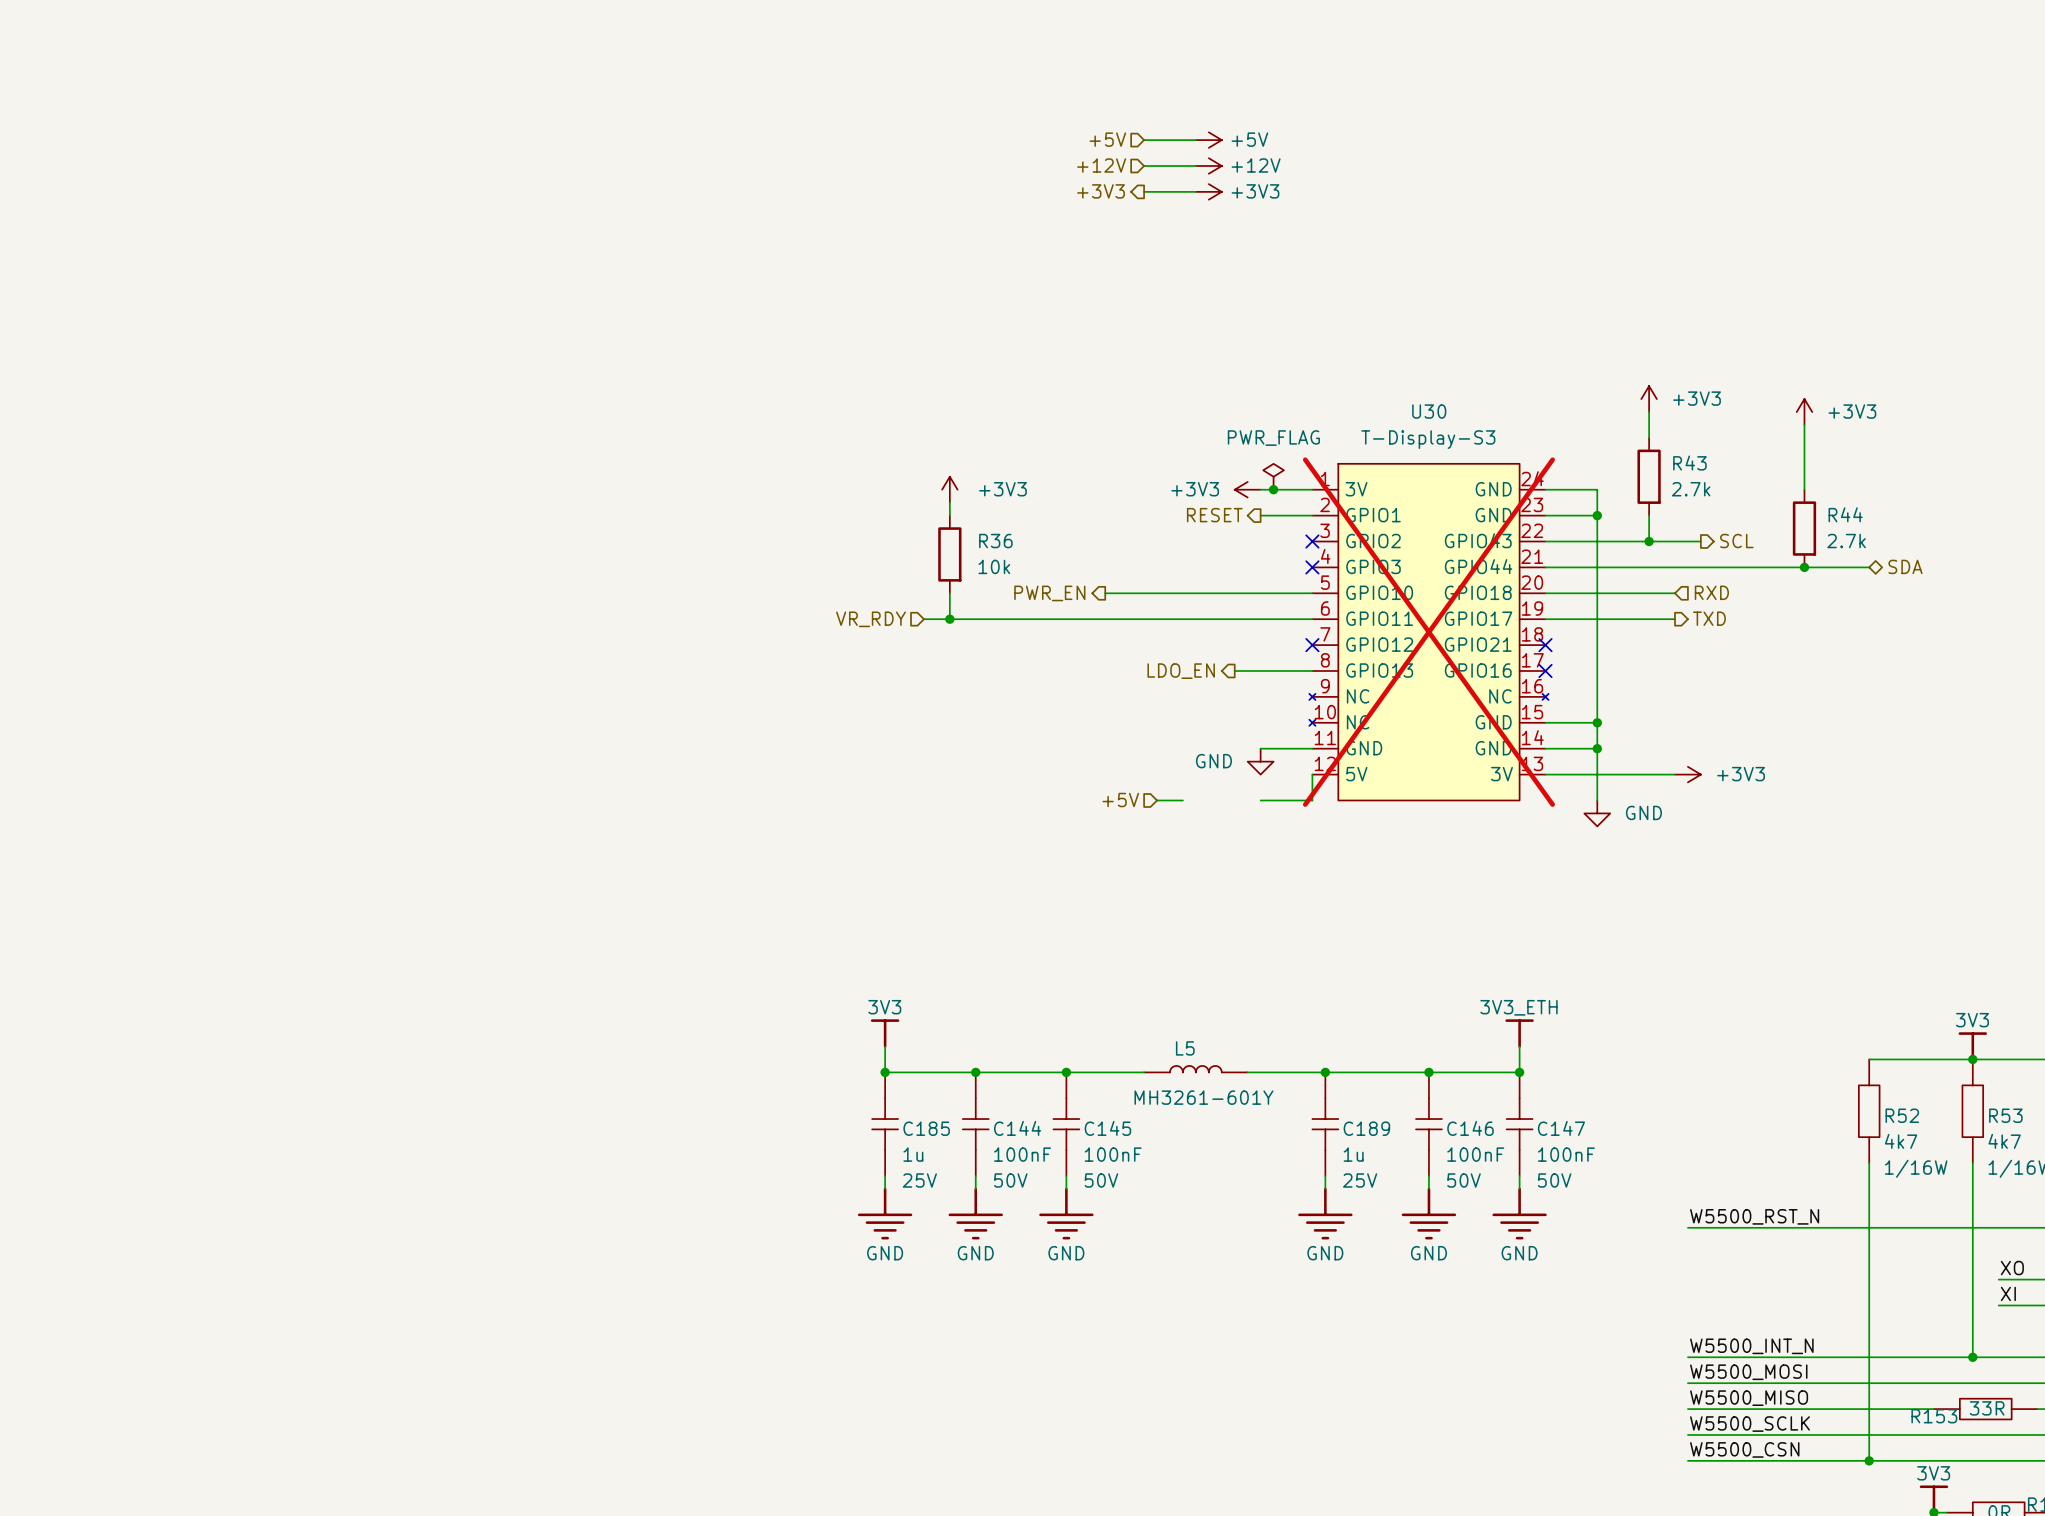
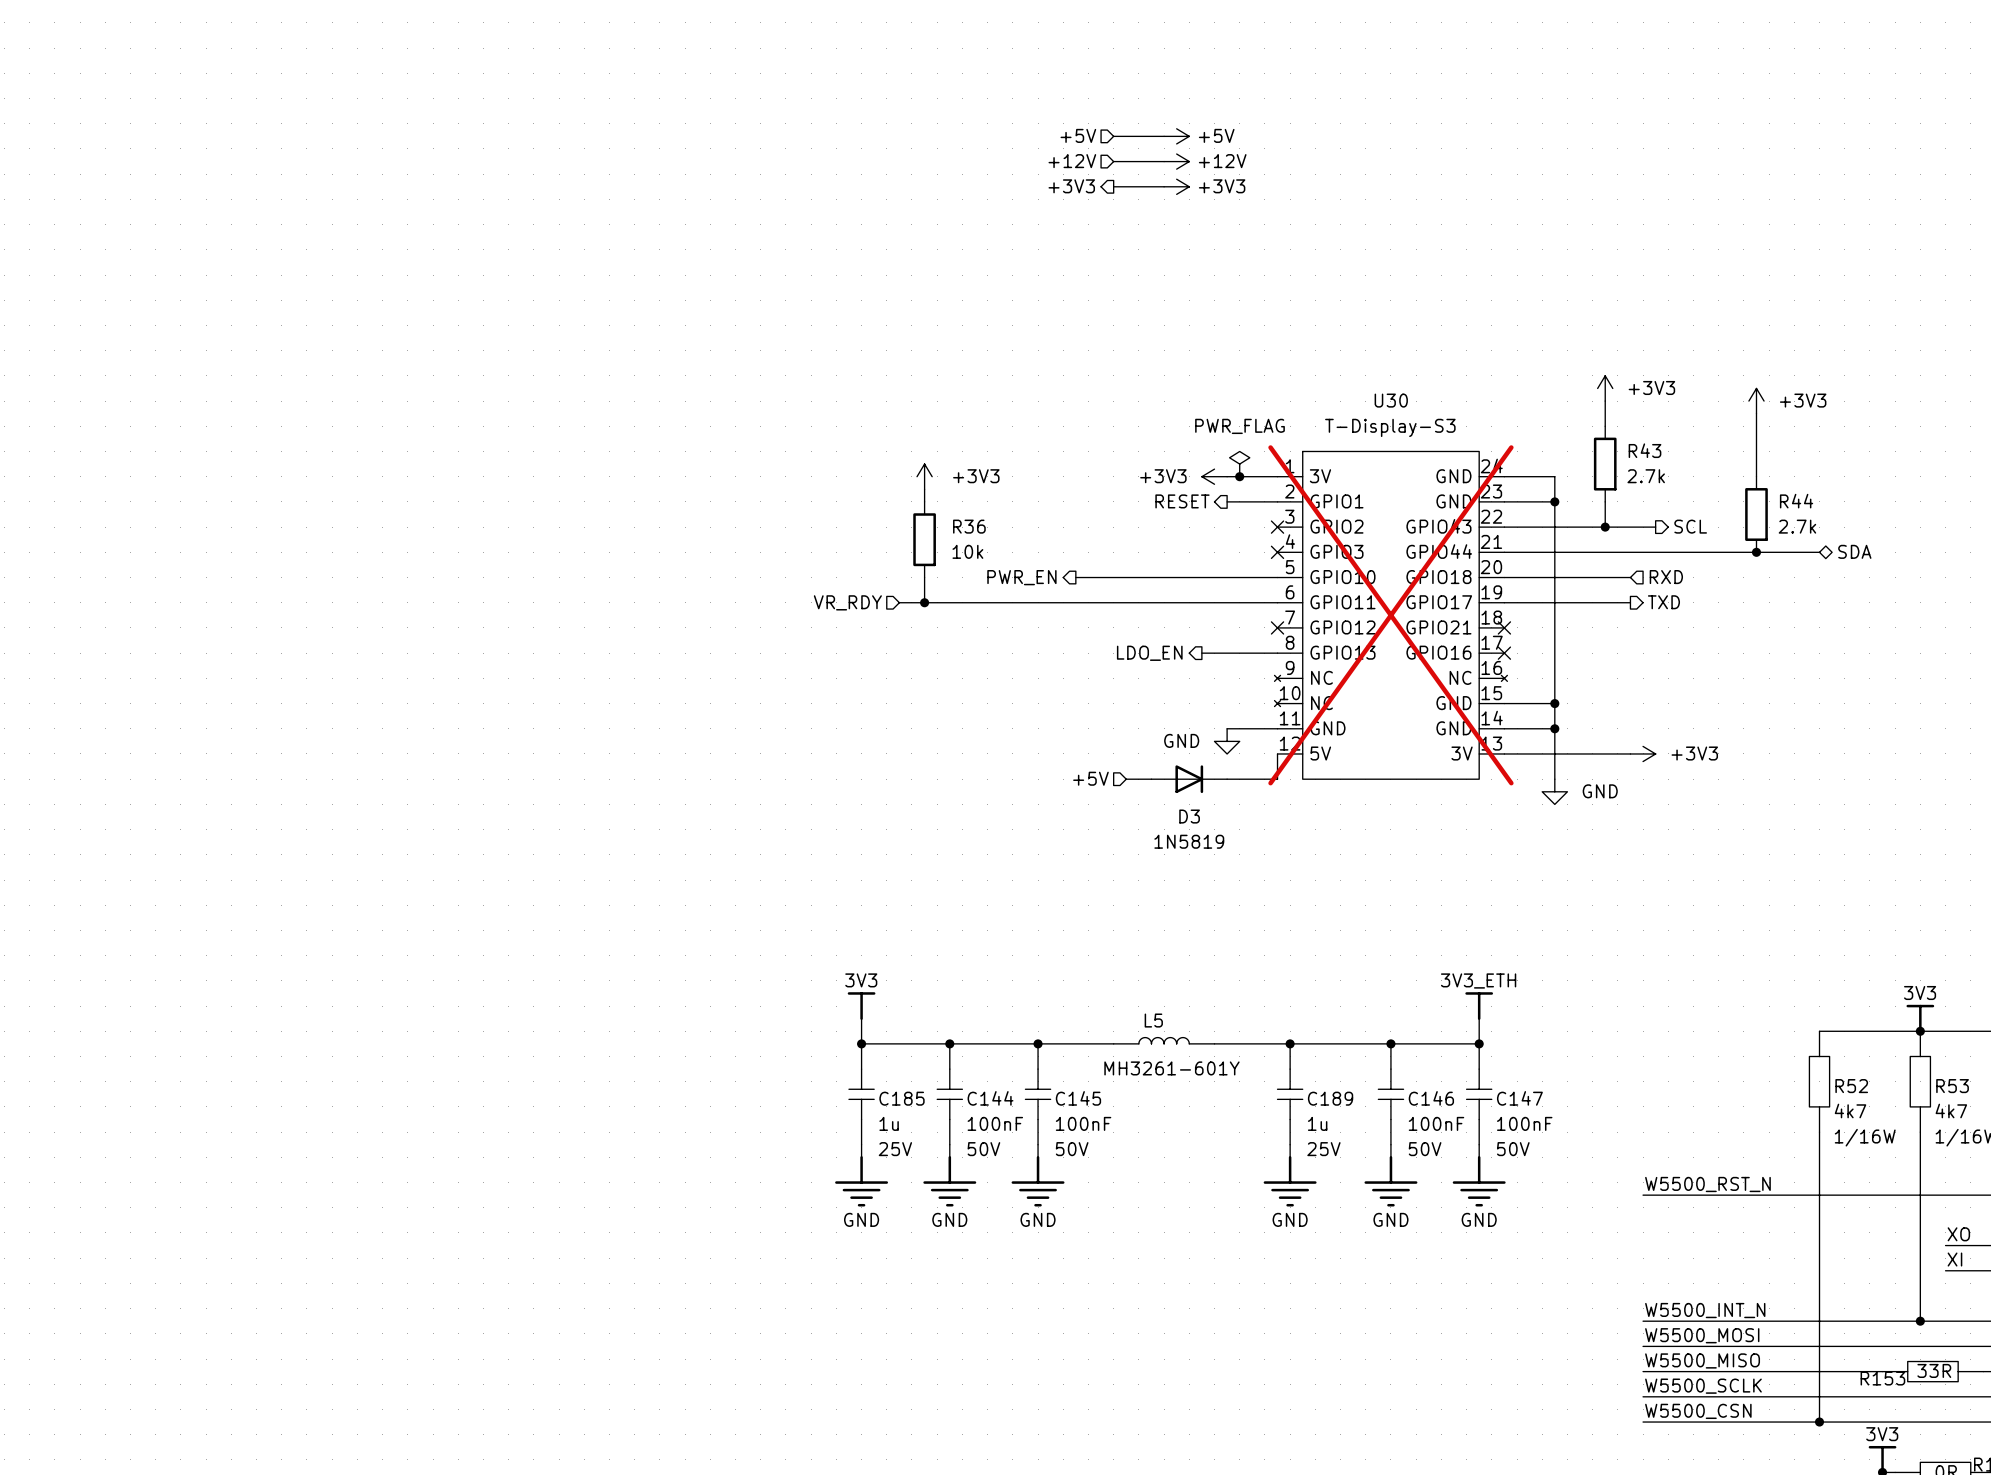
D3: none -> 1N5819 (1189, 779)

